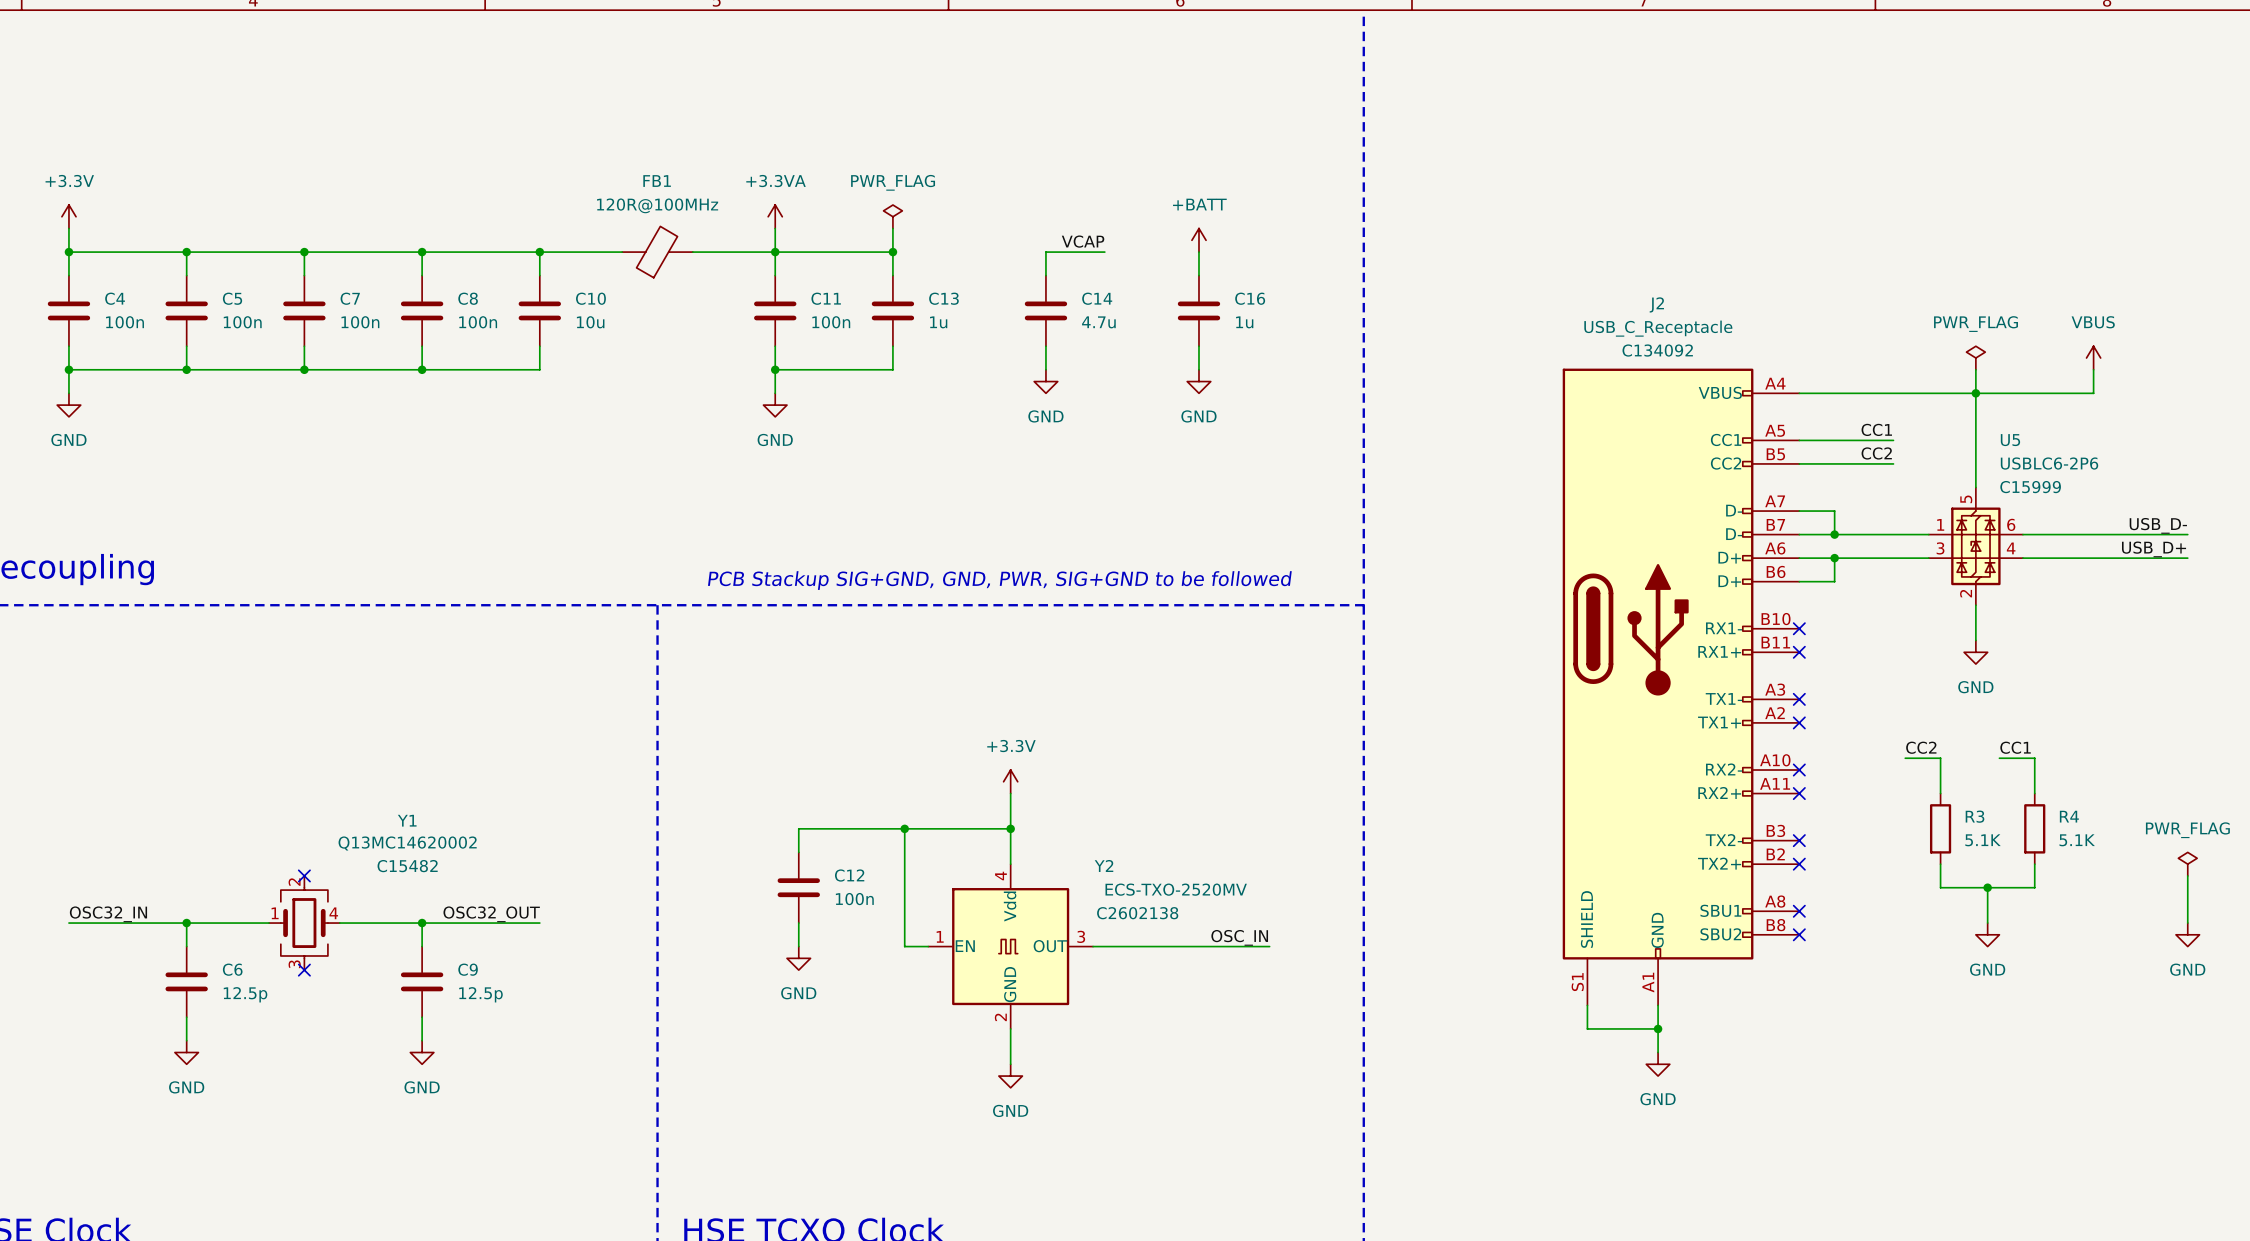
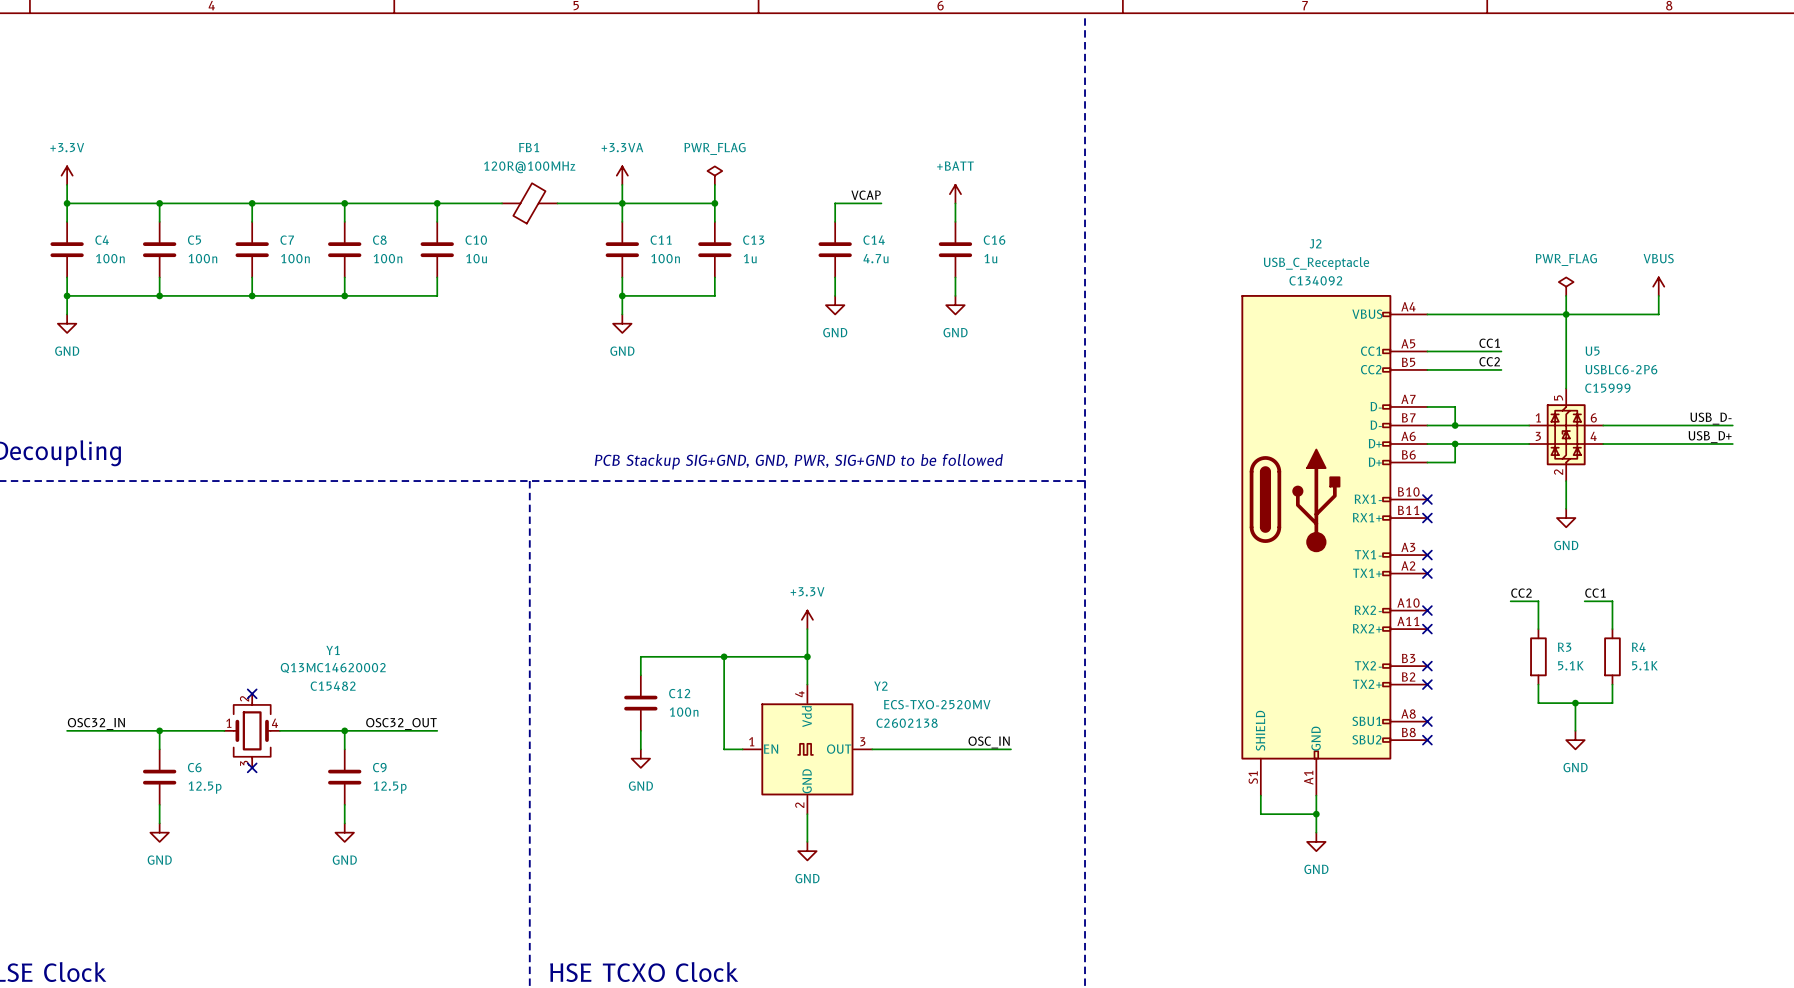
power symbol: PWR_FLAG (2187, 864) -> none
wire: (2187, 875) (2187, 923) -> none
power symbol: GND (2187, 934) -> none

